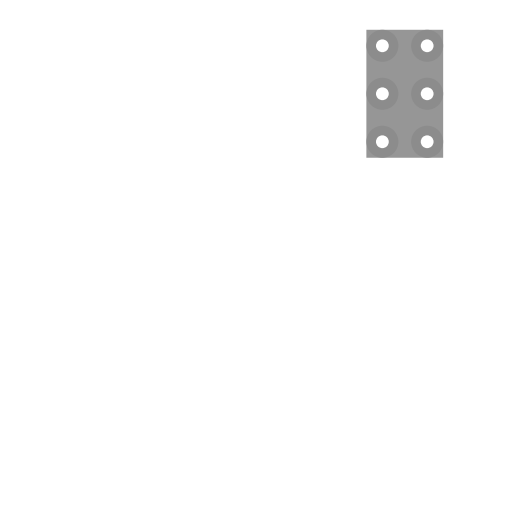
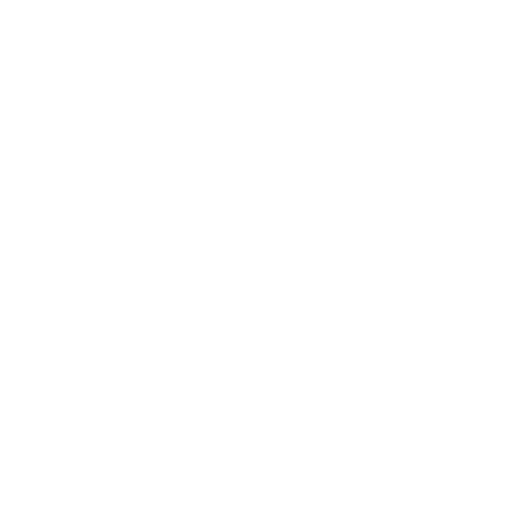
part: (404, 93) -> none

